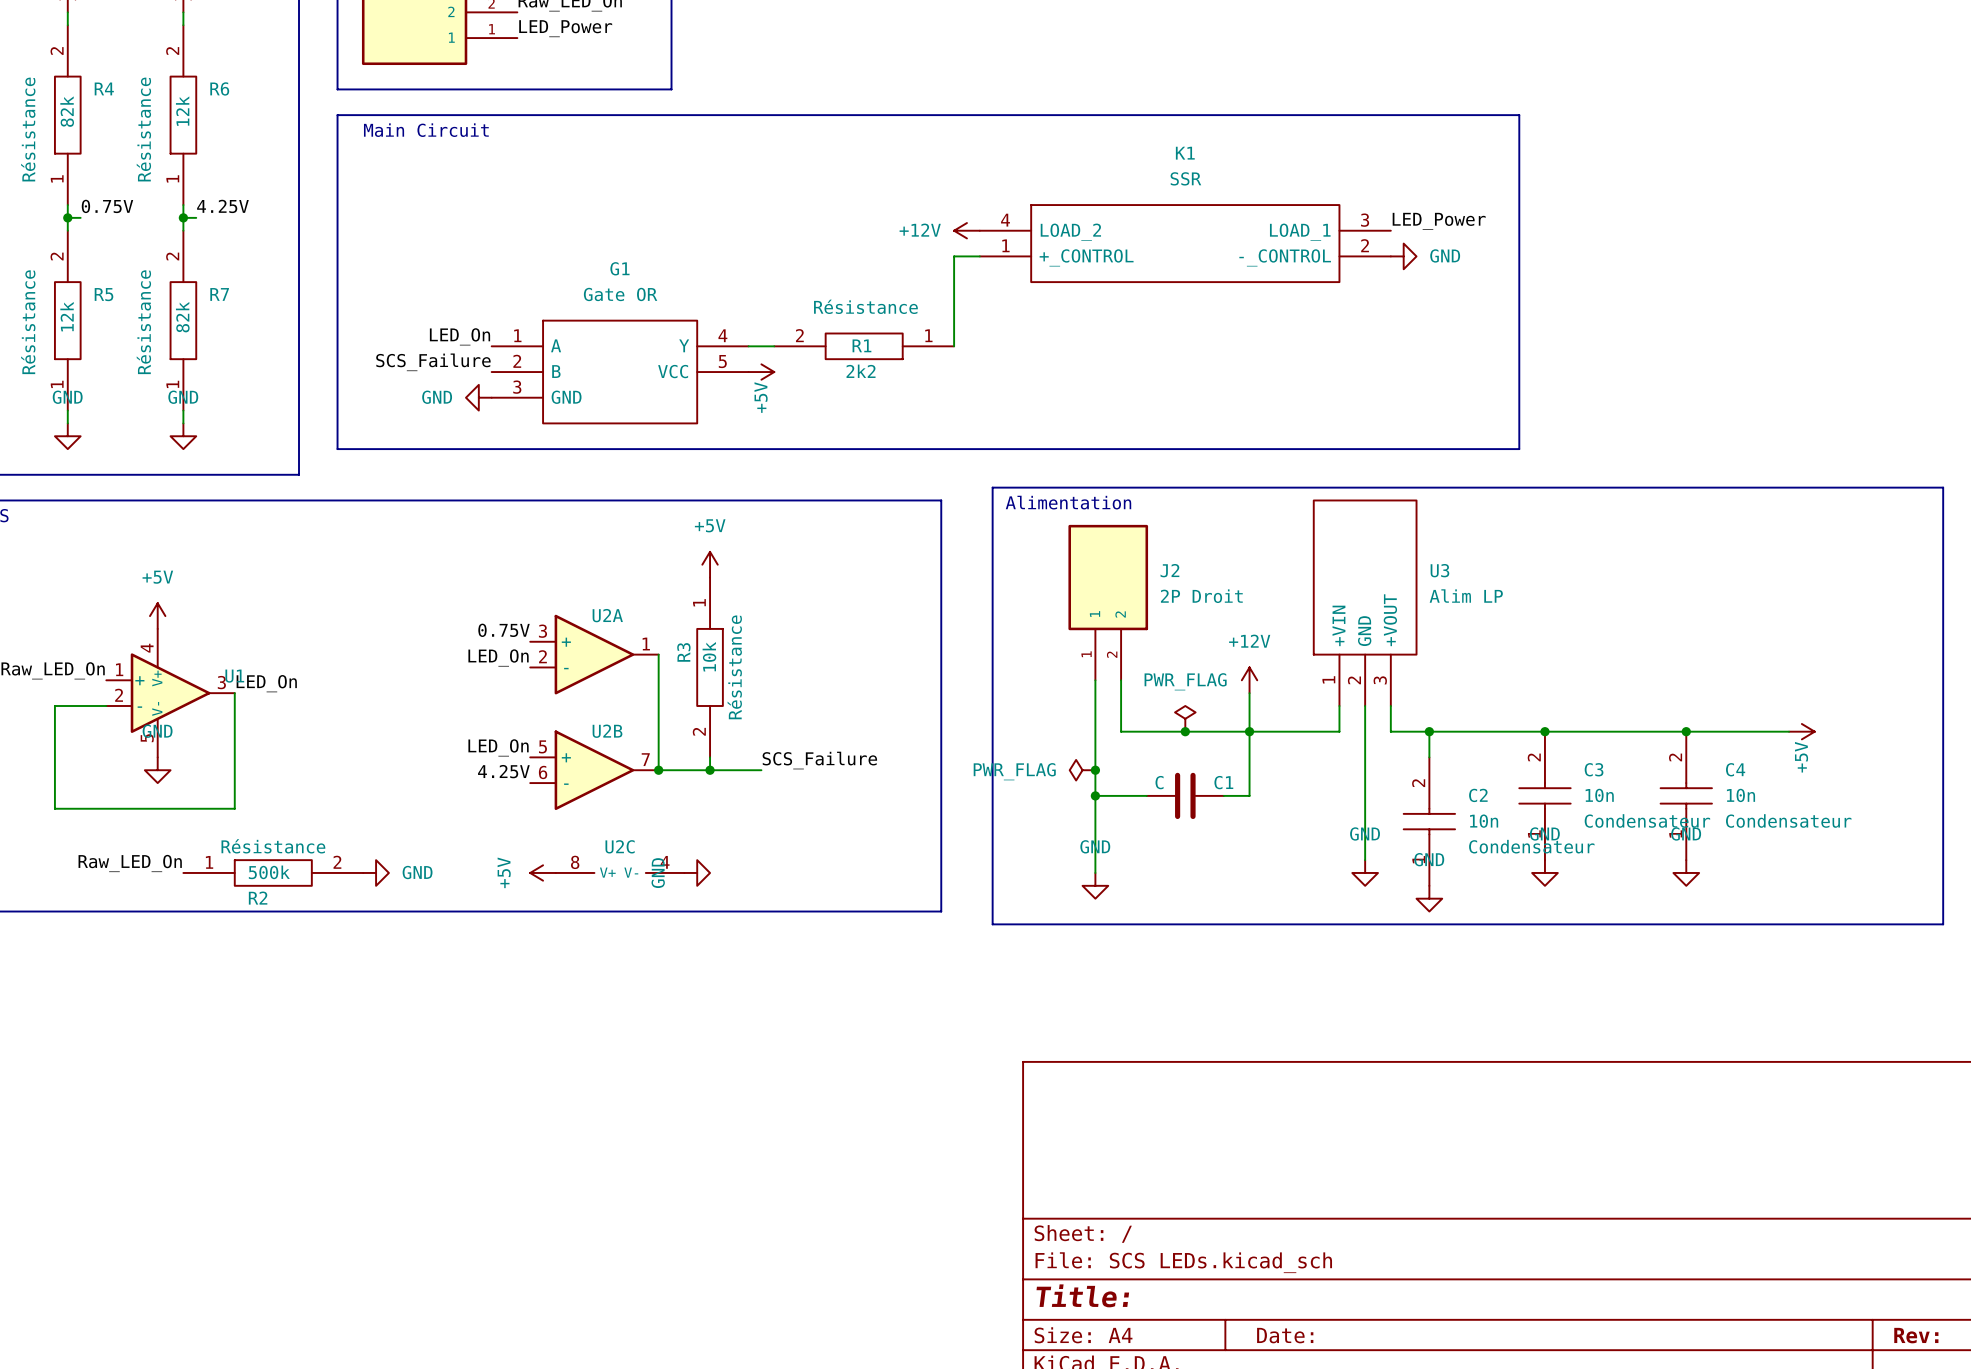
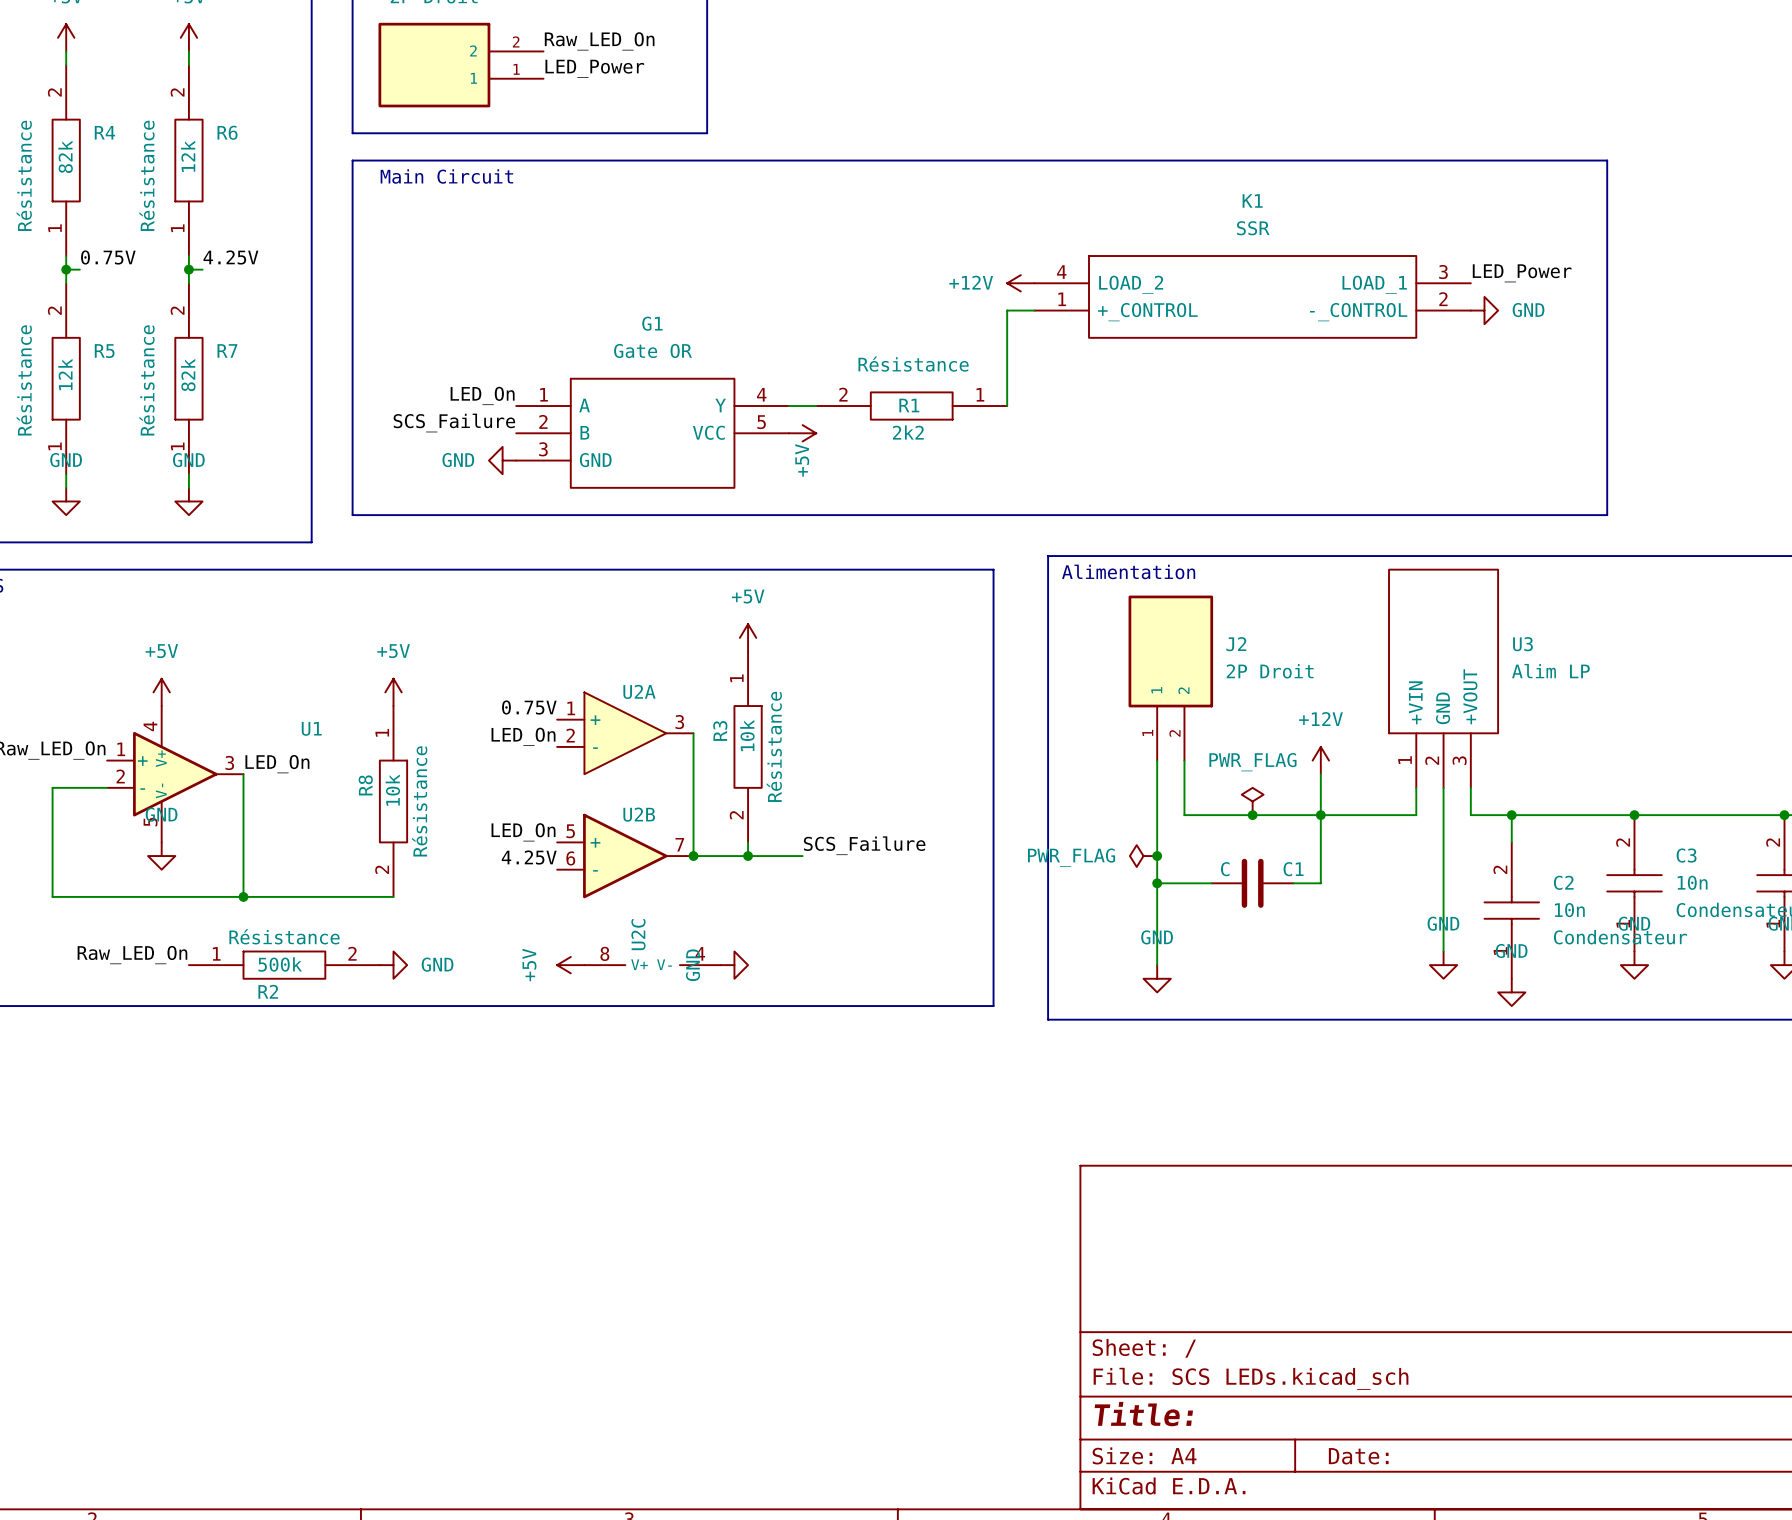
U2A symbol: [530, 614, 659, 695] -> [557, 692, 694, 775]
power symbol: none -> +5V (393, 692)
U1 name position: U1 (234, 676) -> U1 (311, 728)
R8: none -> 10k (393, 801)
wire: none -> (243, 896) (393, 896)
junction: none -> (243, 896)
U2C name rotation: 0° (620, 846) -> 90° counterclockwise (638, 934)

